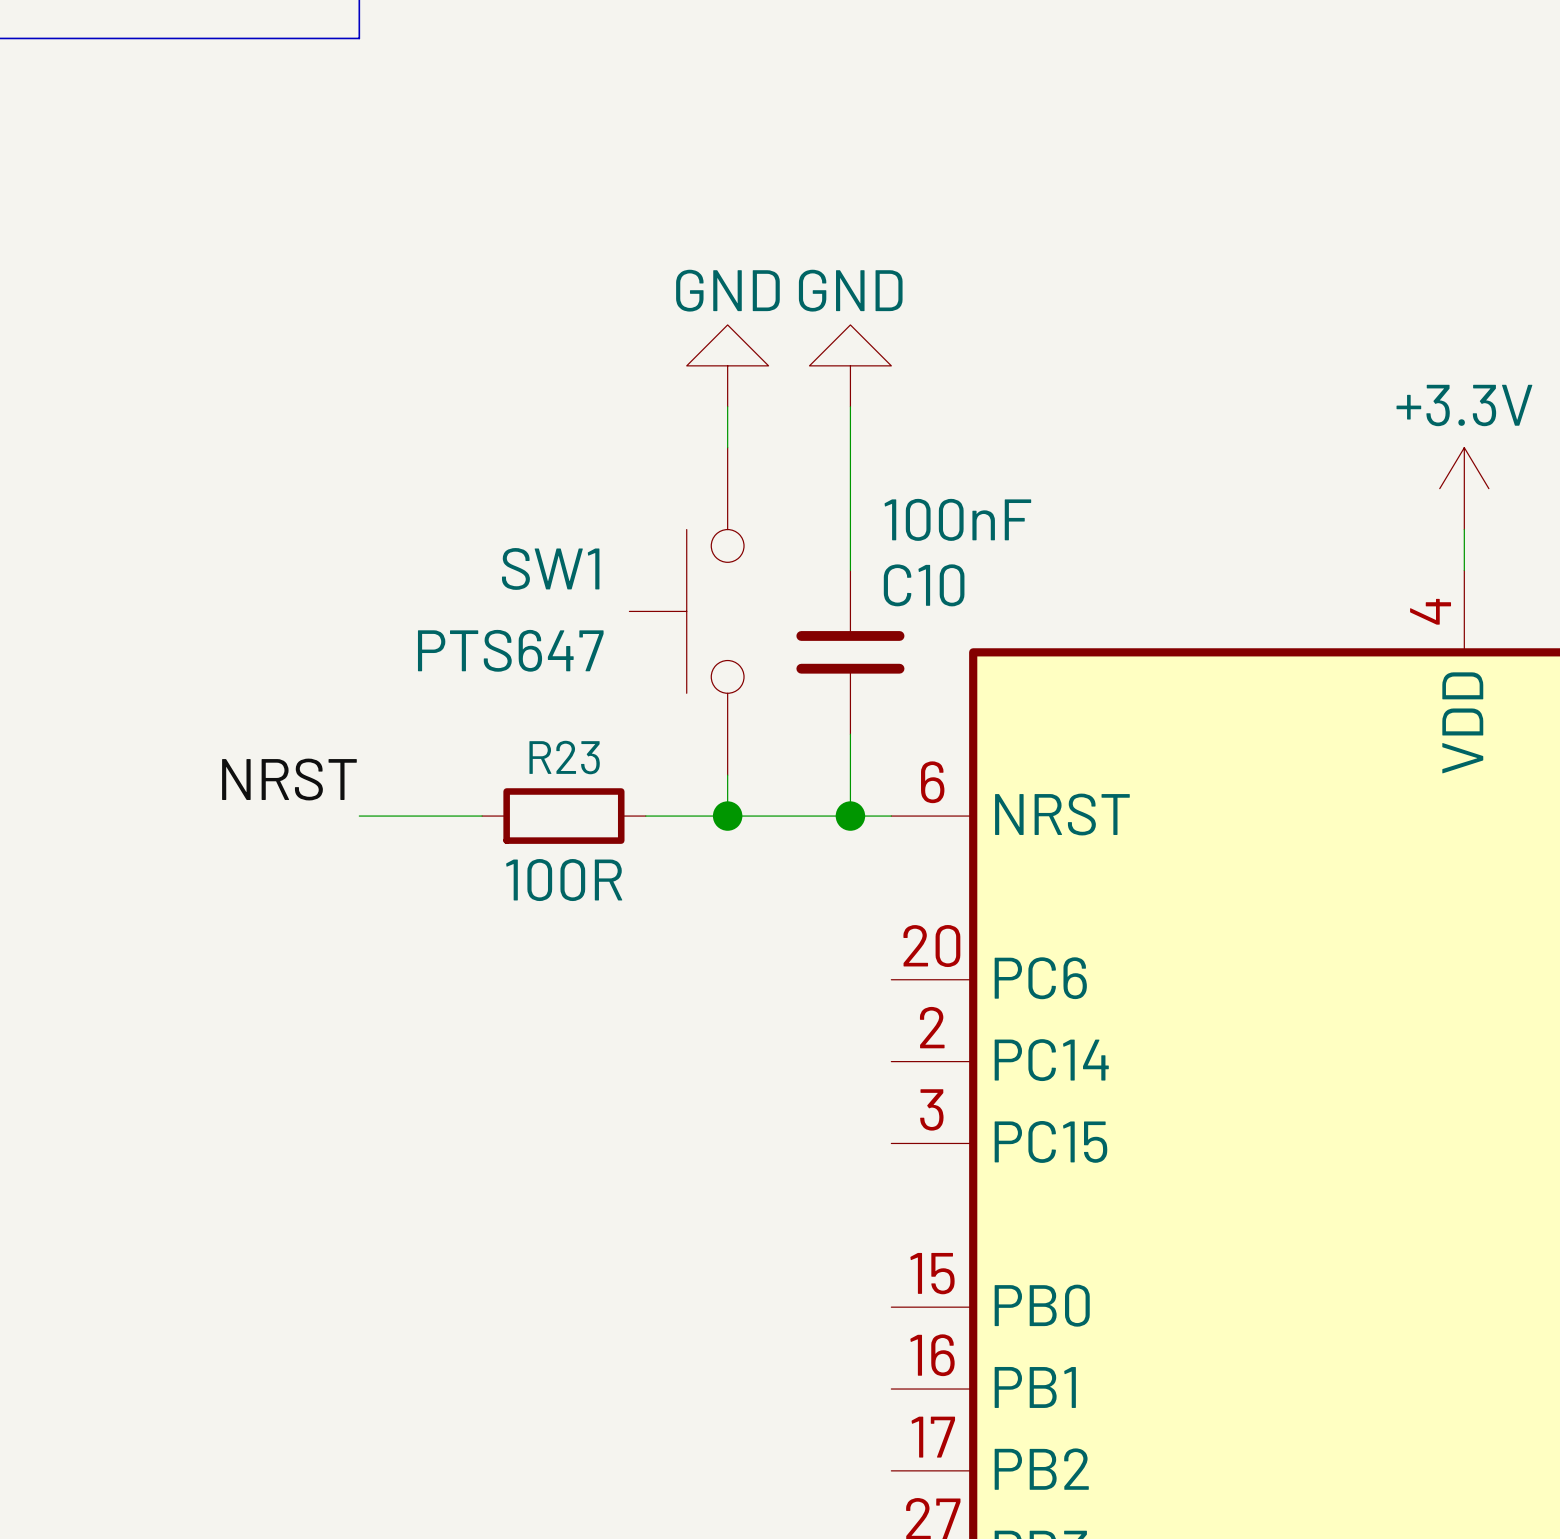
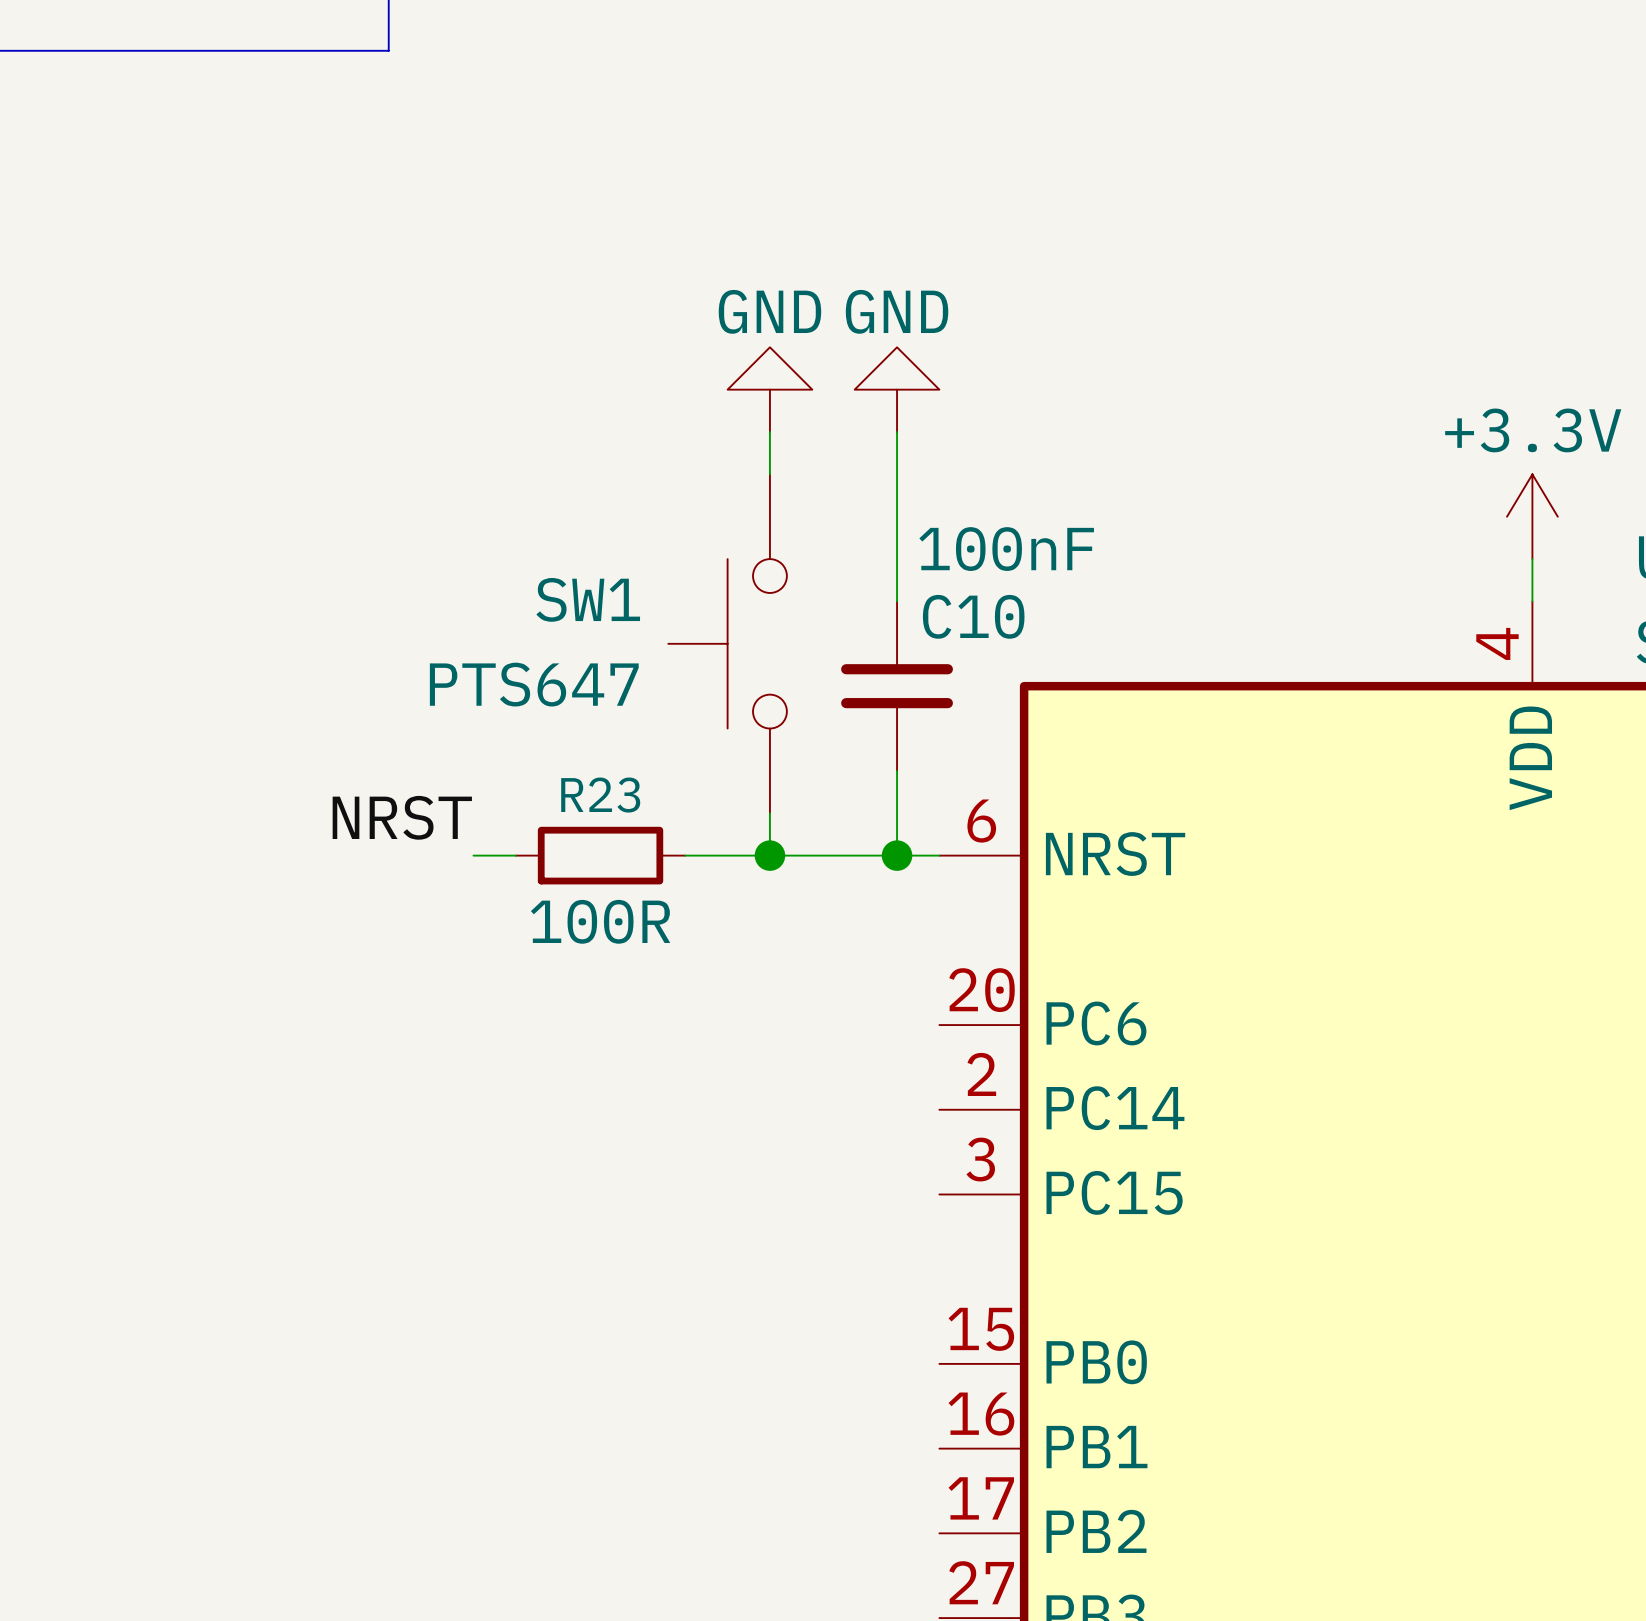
label position: NRST (289, 779) -> NRST (402, 817)
wire: (359, 816) (441, 816) -> none

